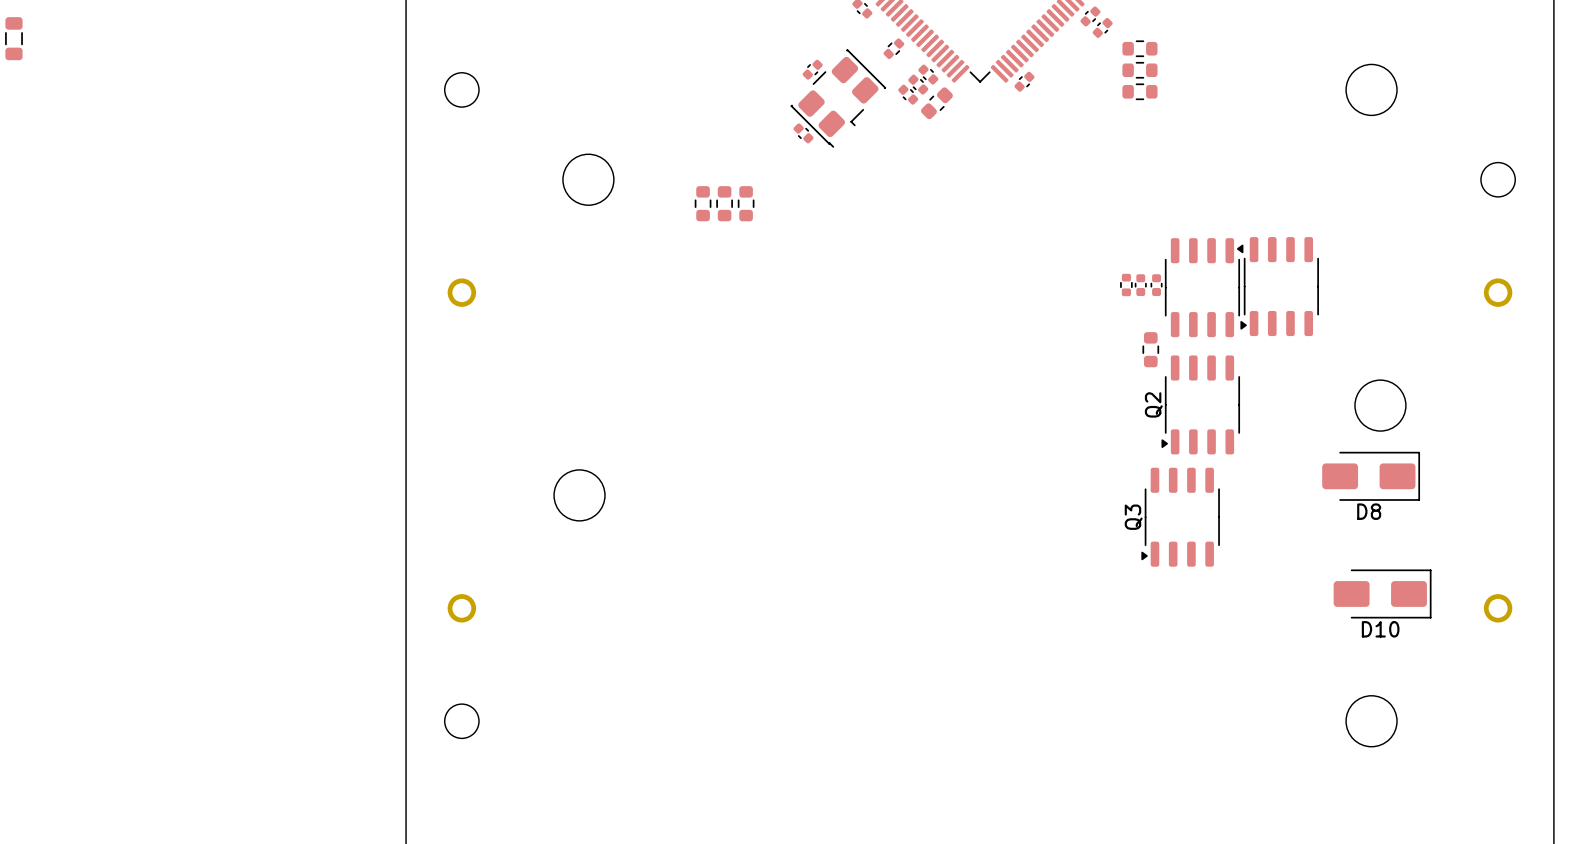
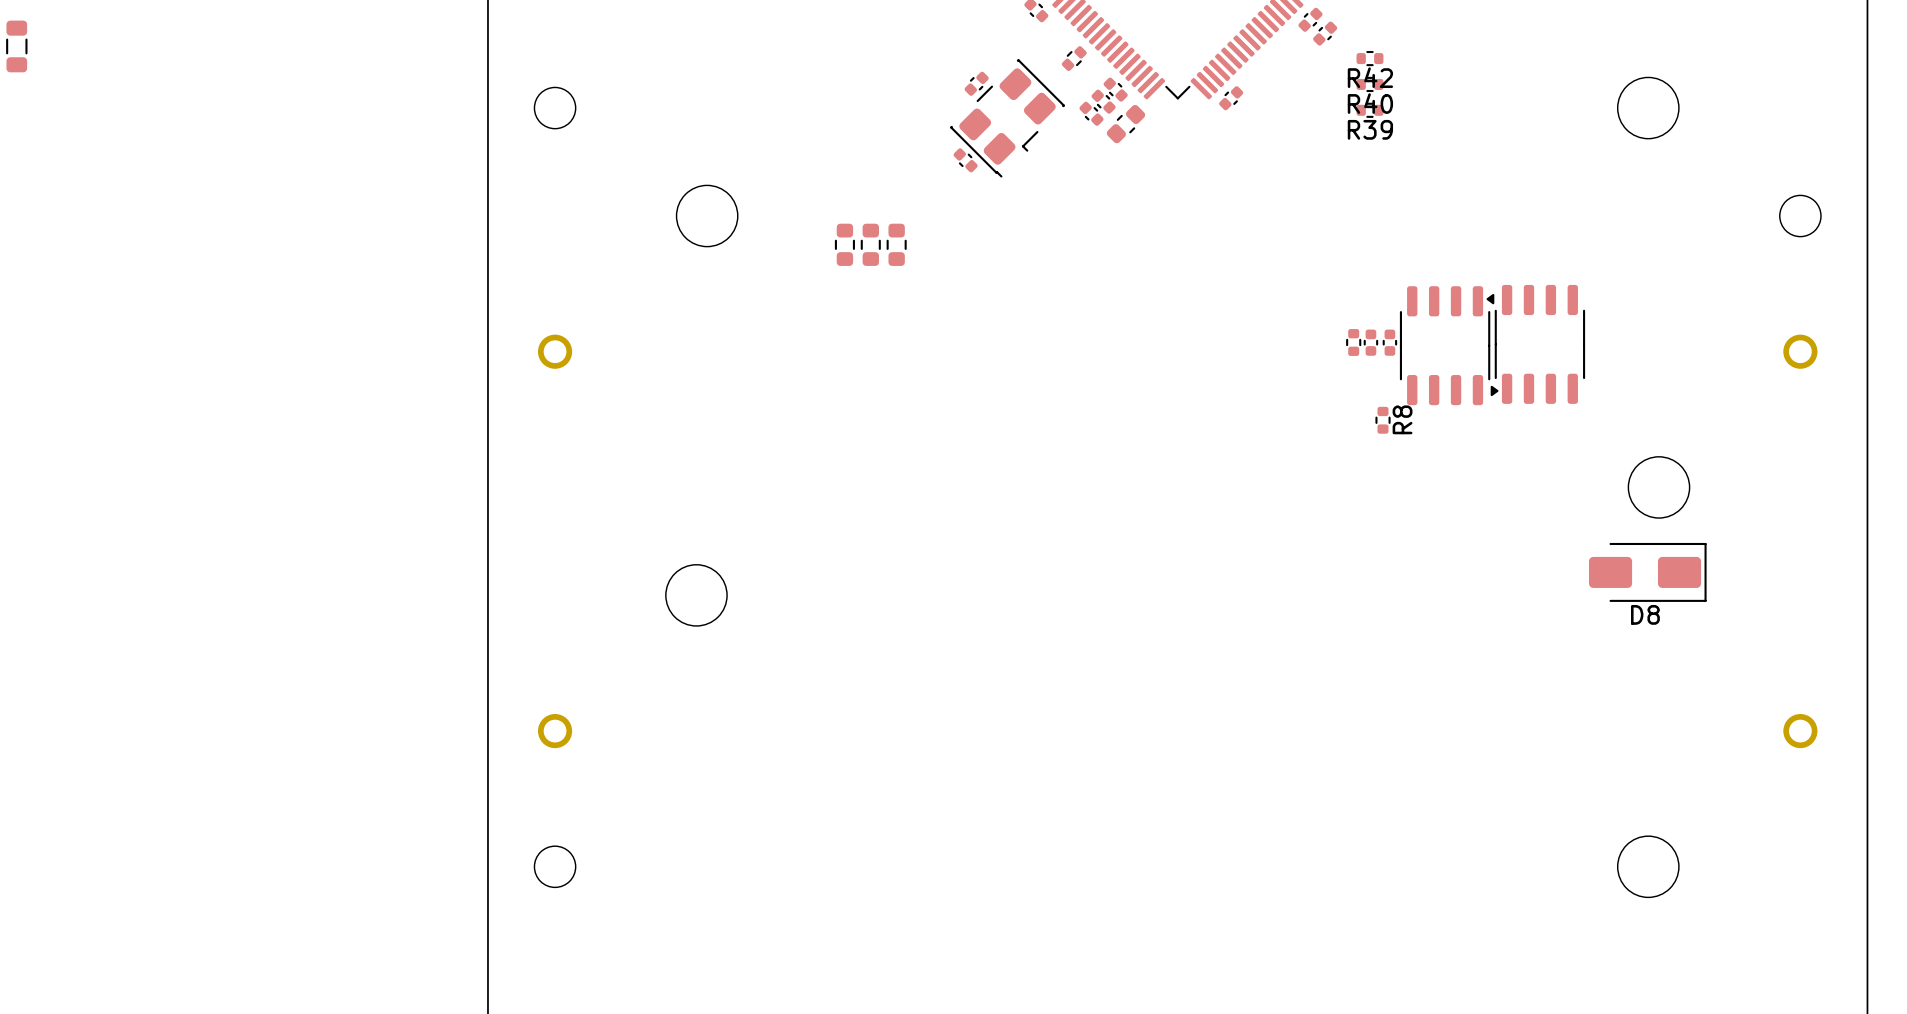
part: (1139, 48) -> none
R42: none -> (1369, 58)
part: (1139, 70) -> none
R40: none -> (1369, 84)
part: (1139, 91) -> none
R39: none -> (1369, 110)
part: (1150, 349) -> none
R8: none -> (1383, 420)
Q2: (1200, 404) -> none
Q3: (1180, 517) -> none
D10: (1382, 593) -> none

